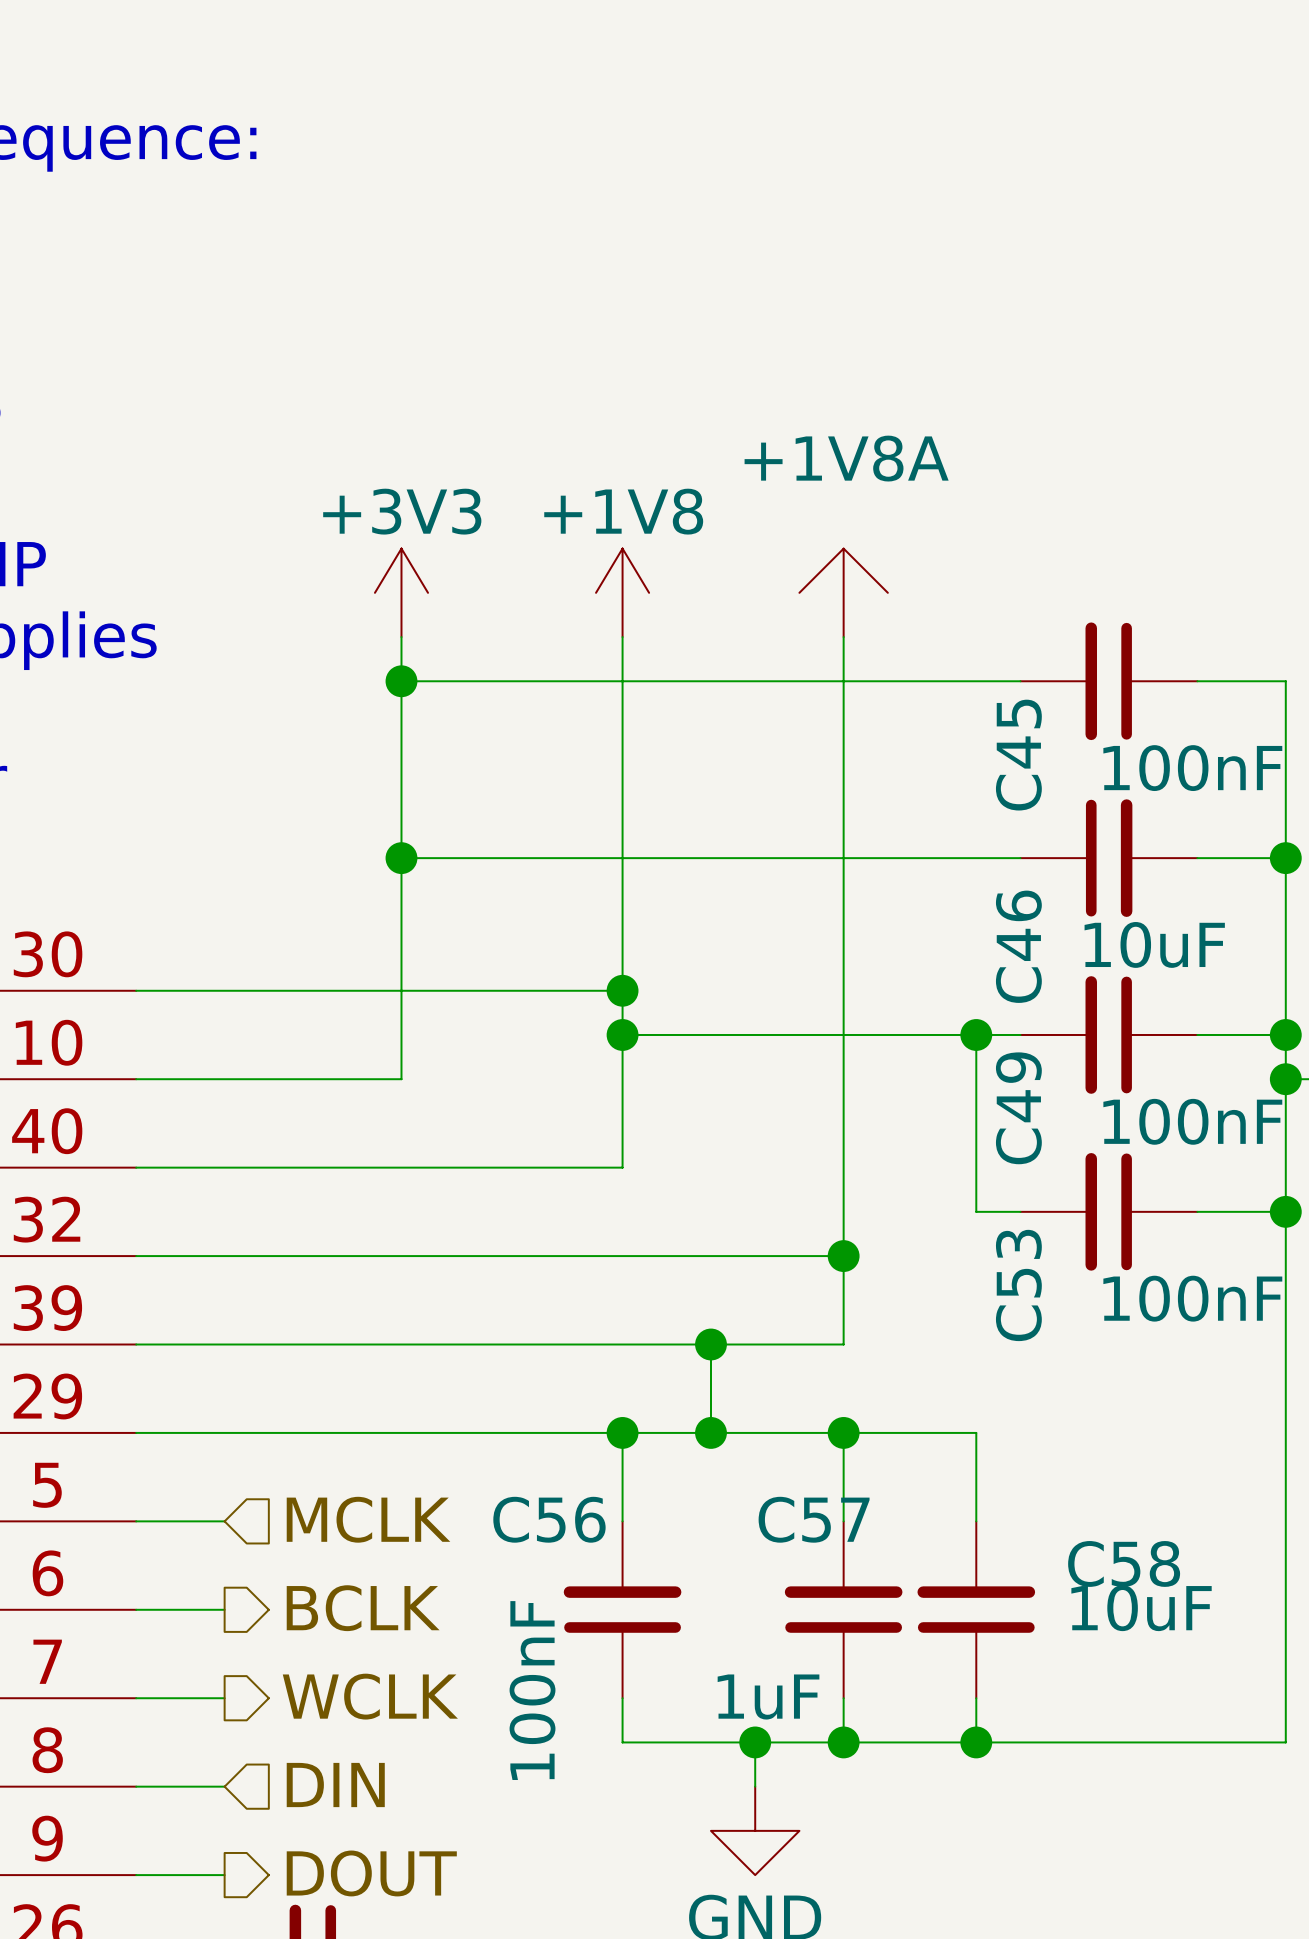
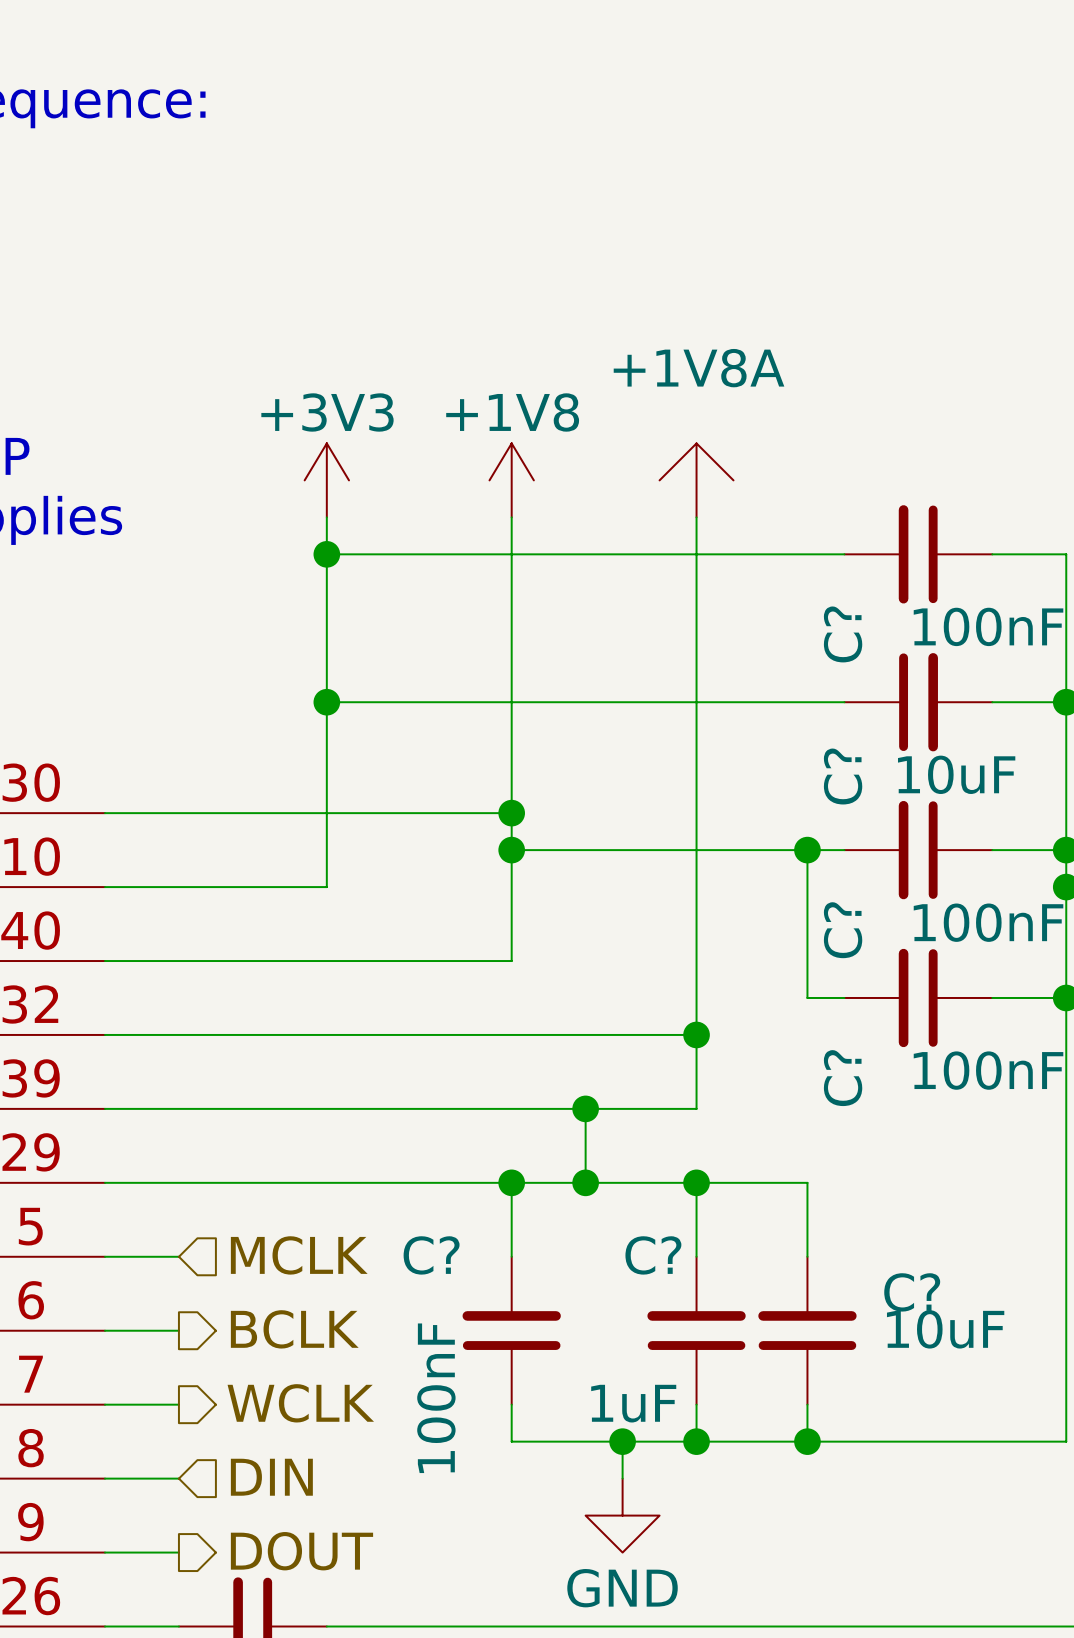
C45 name: C45 (1018, 755) -> C? (843, 634)
C46 name: C46 (1018, 946) -> C? (843, 776)
C49 name: C49 (1018, 1108) -> C? (843, 930)
C53 name: C53 (1018, 1285) -> C? (843, 1078)
C56 name: C56 (549, 1519) -> C? (431, 1255)
C57 name: C57 (814, 1519) -> C? (653, 1255)
C58 name: C58 (1124, 1563) -> C? (912, 1292)

